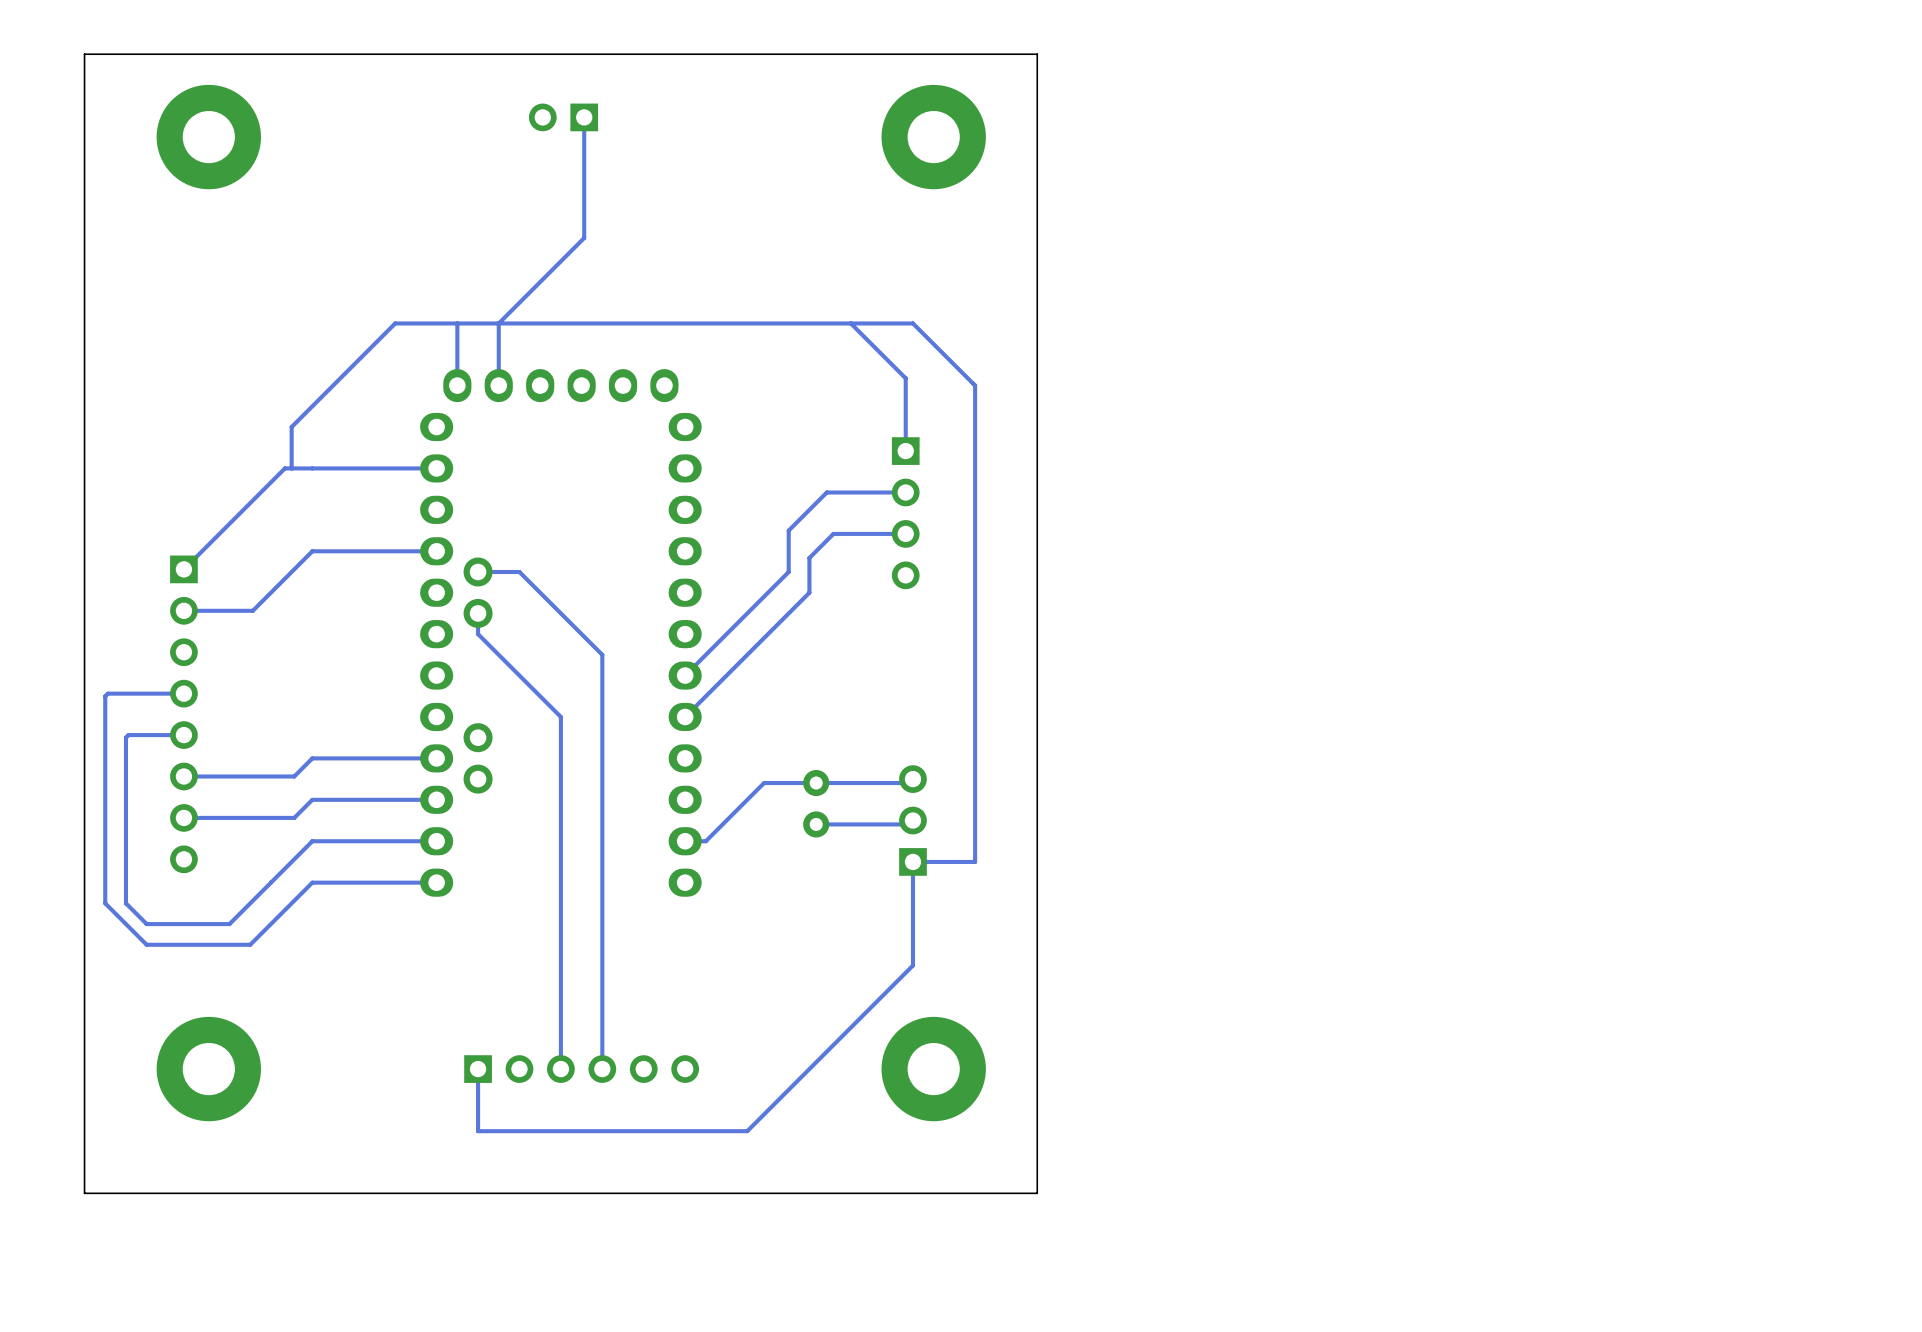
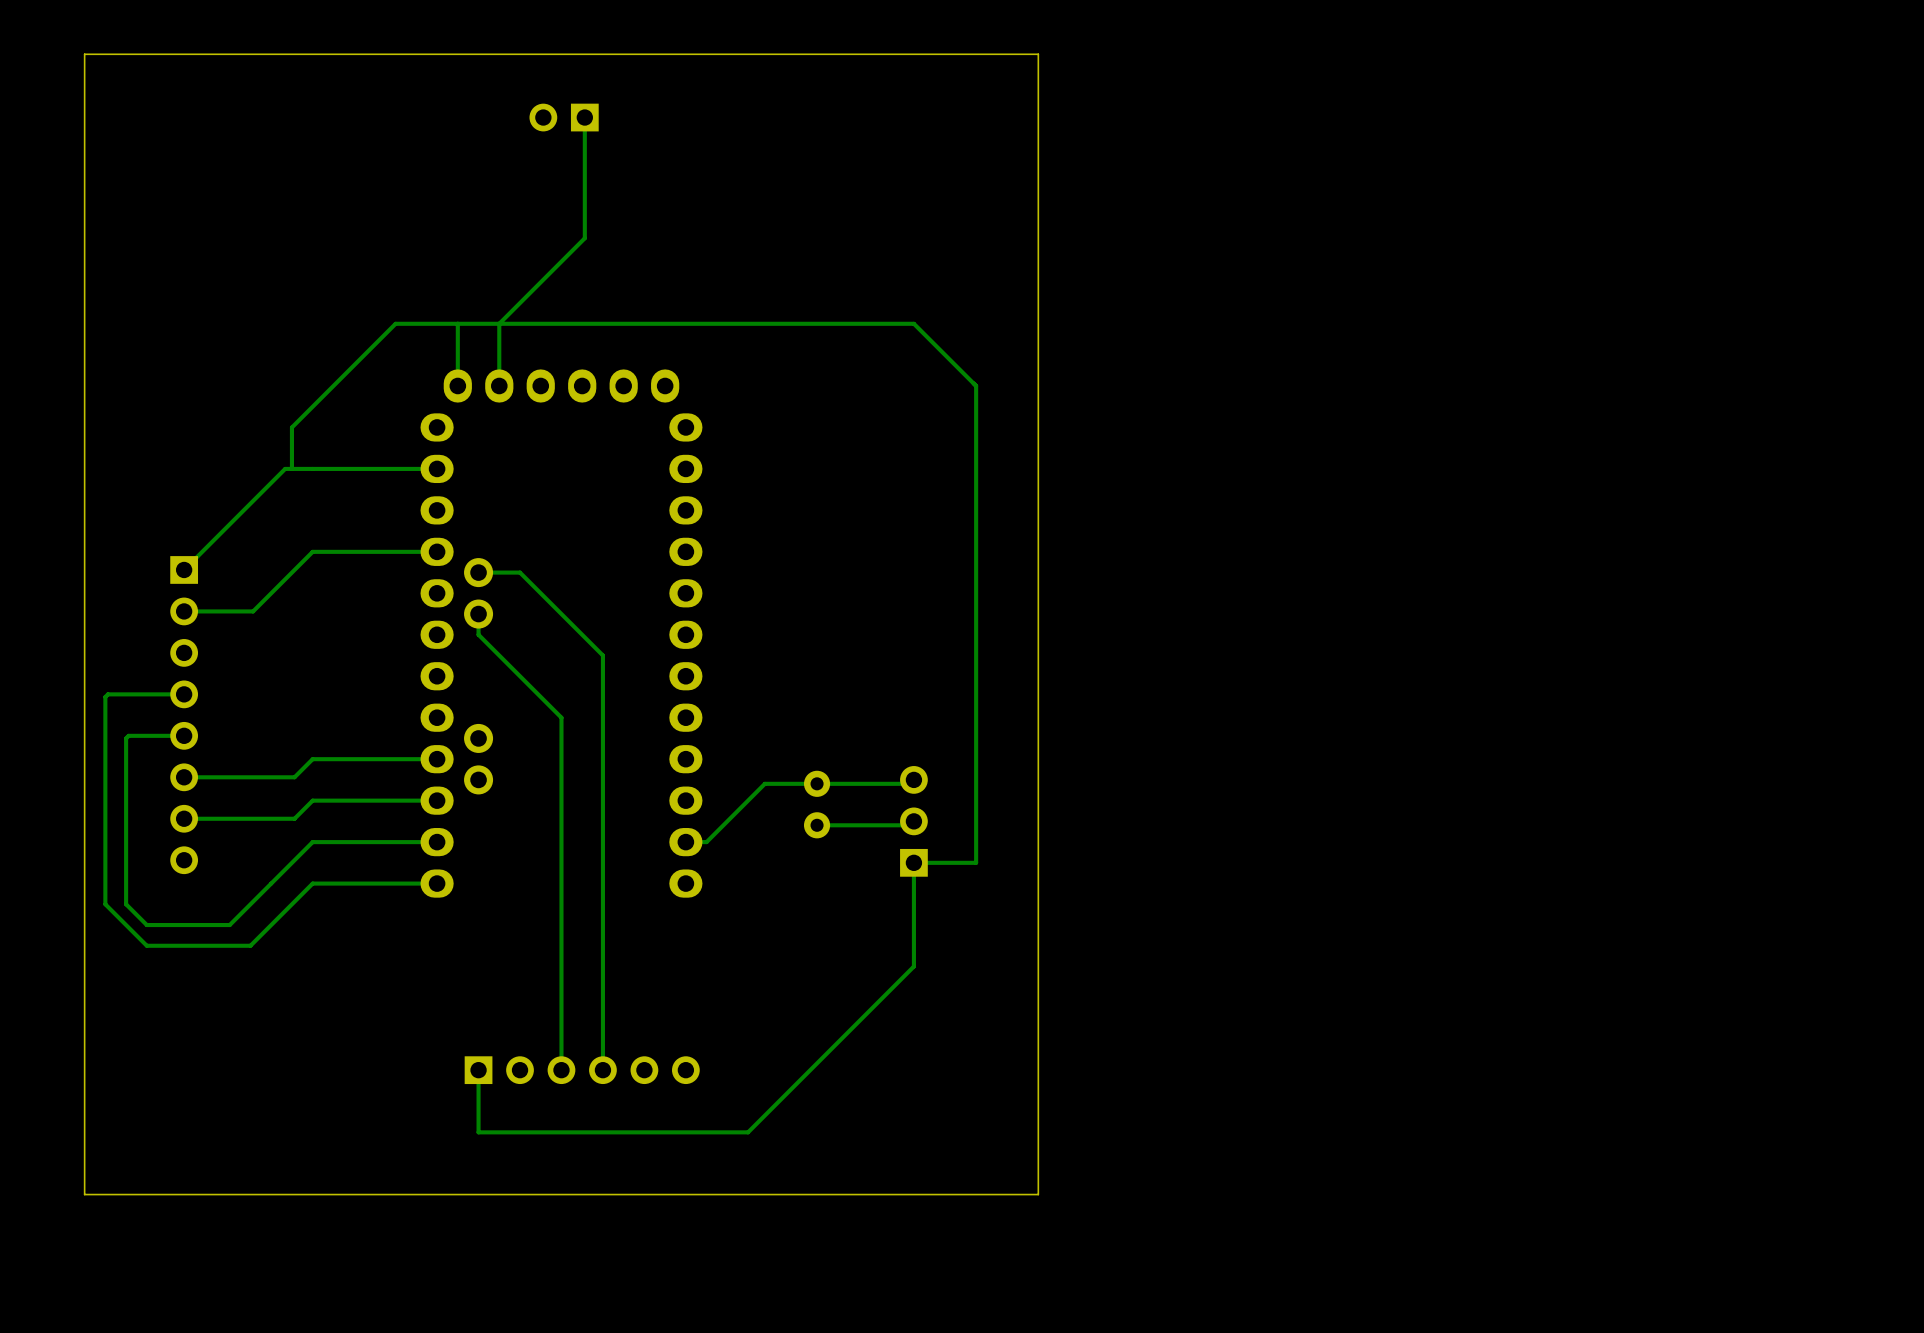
part: (208, 137) -> none
part: (933, 137) -> none
track: (850, 323) (905, 378) (905, 451) -> none
track: (905, 492) (826, 492) (788, 530) (788, 571) (685, 675) -> none
part: (905, 513) -> none
track: (905, 533) (833, 533) (809, 557) (809, 592) (685, 716) -> none
part: (208, 1069) -> none
part: (933, 1069) -> none

